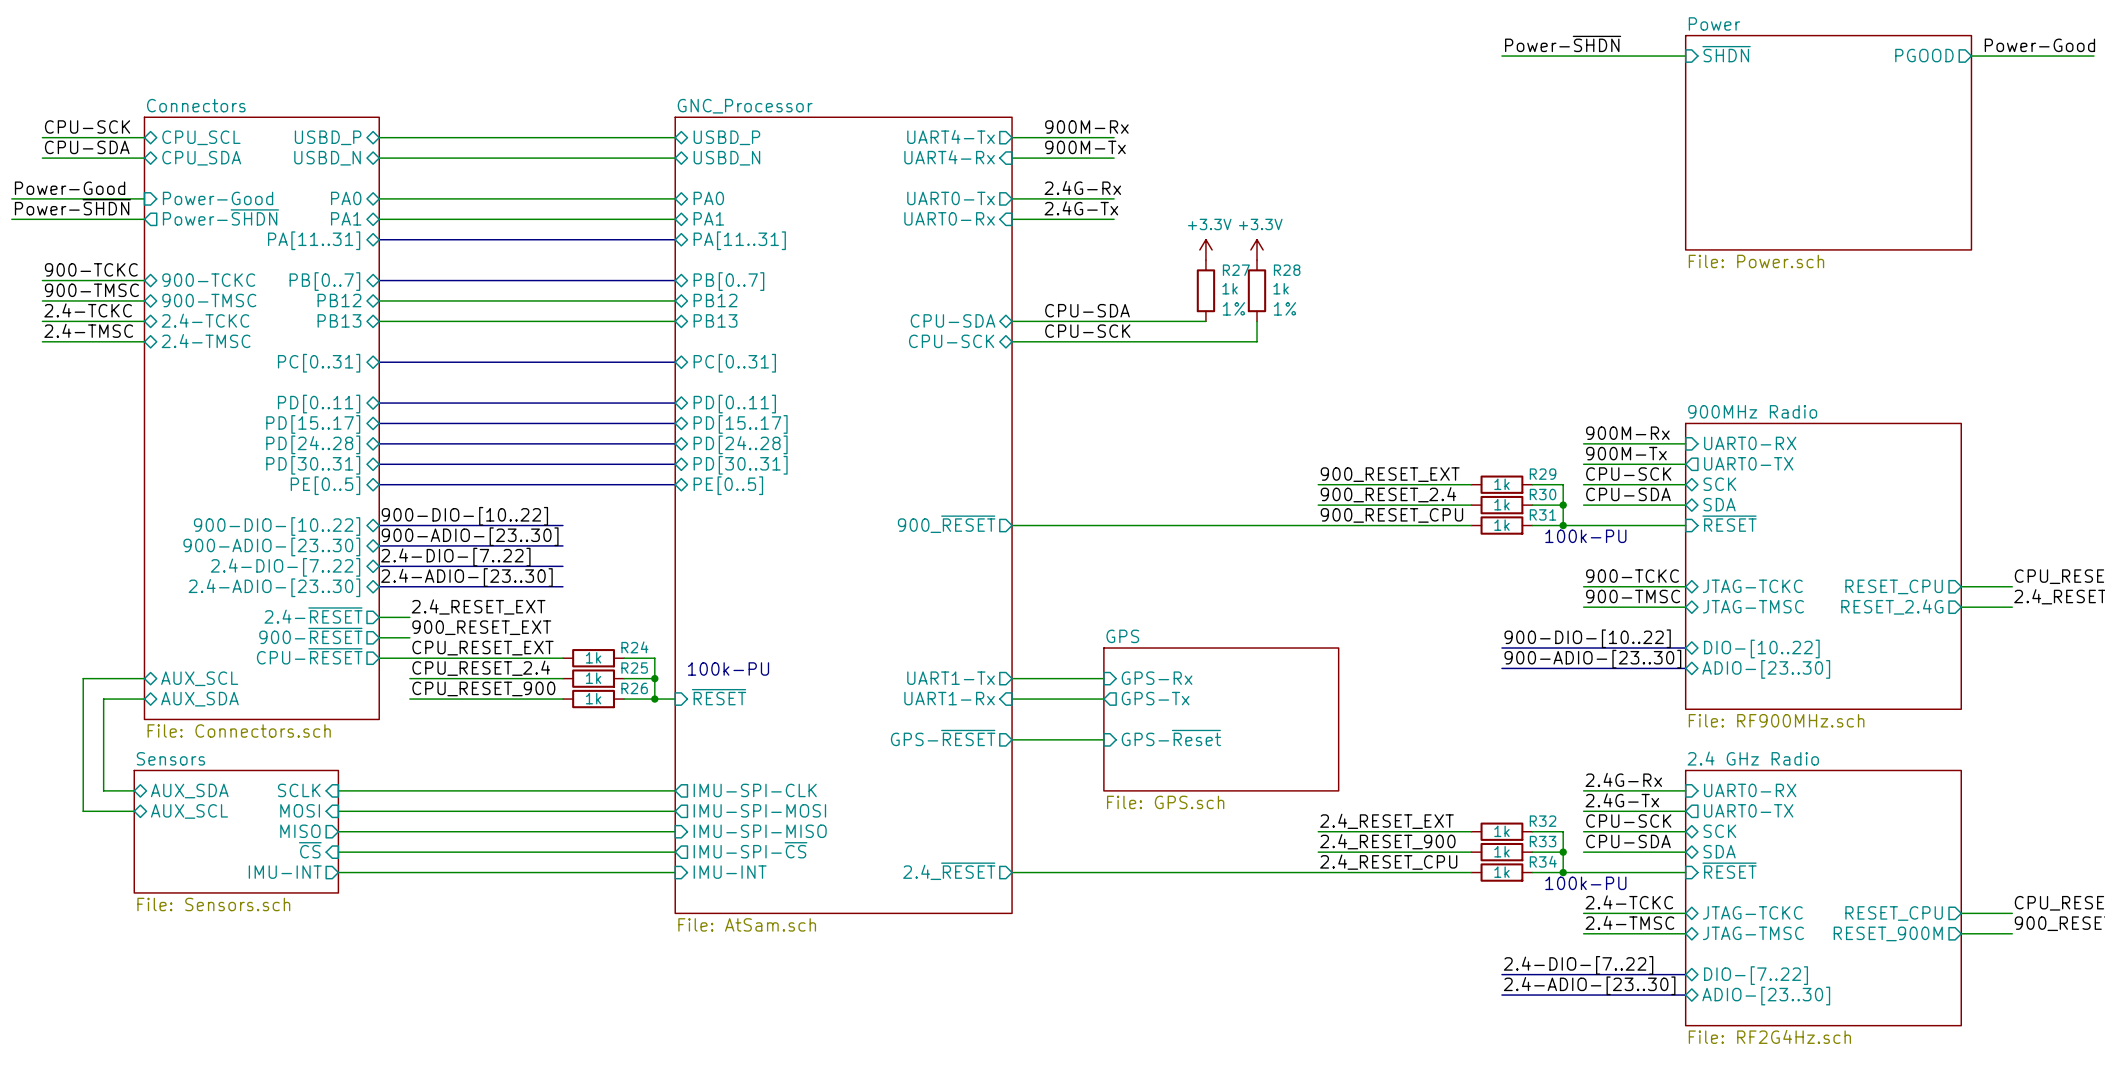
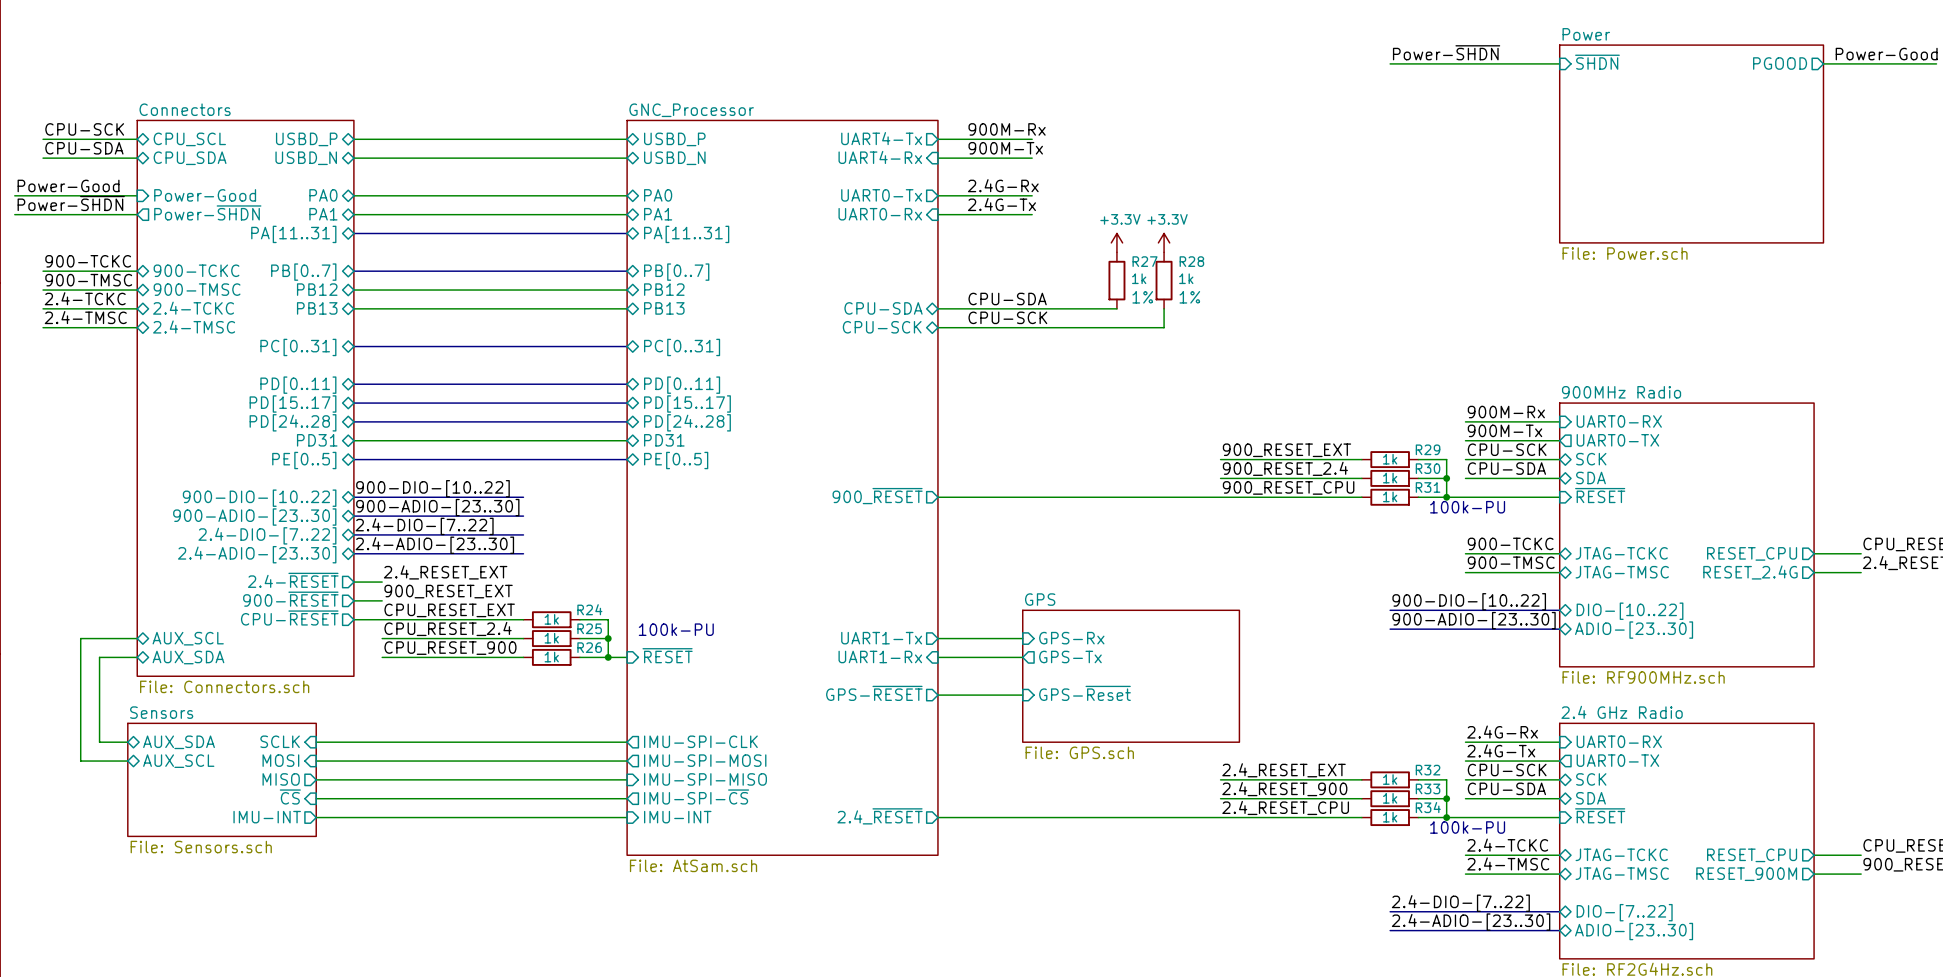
bus: (379, 464) (675, 464) -> none
sheet pin: PD[30..31] (313, 465) -> PD31 (317, 440)
sheet pin: PD[30..31] (740, 465) -> PD31 (664, 440)

